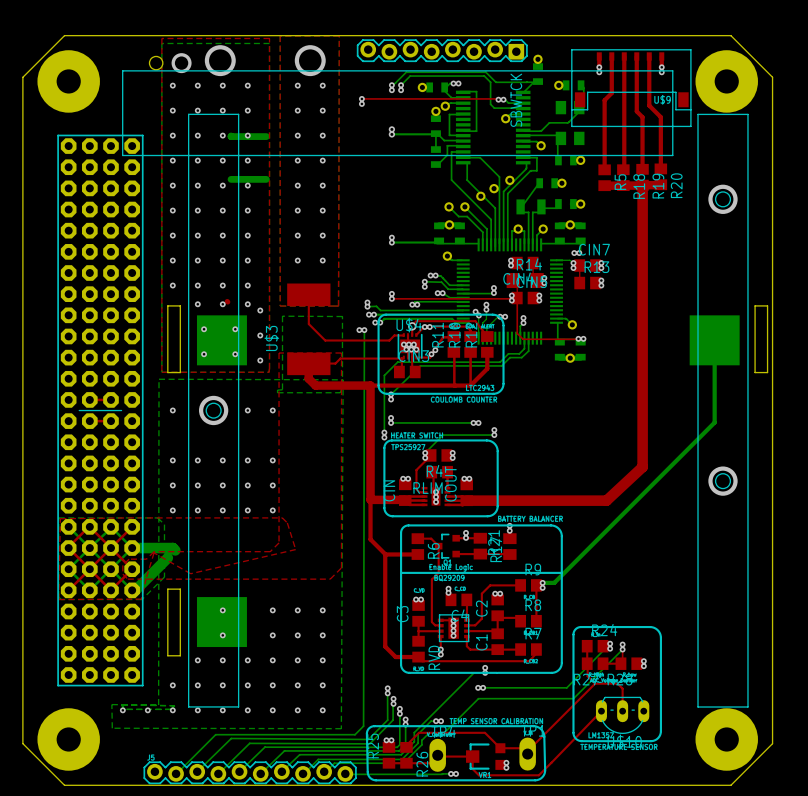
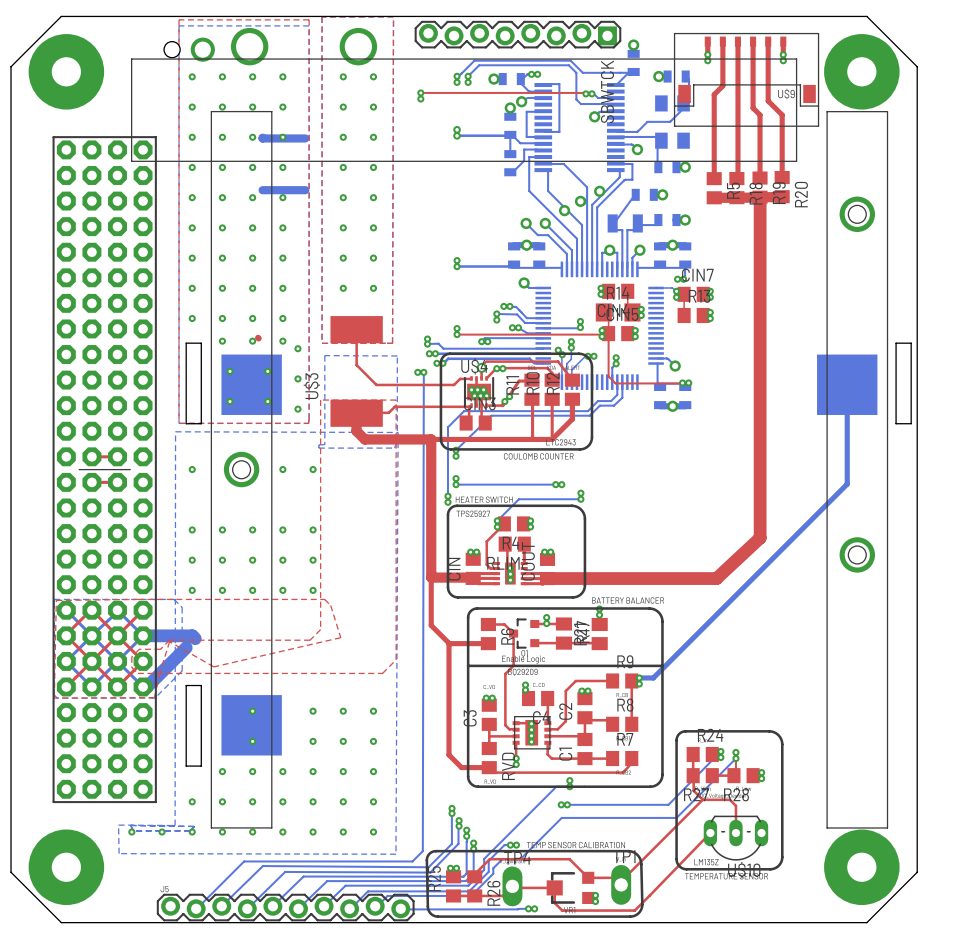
via: (387, 688) -> none
via: none -> (452, 808)
via: (387, 693) -> none
via: none -> (452, 813)
via: (393, 698) -> none
via: none -> (459, 820)
via: (393, 703) -> none
via: none -> (459, 826)

